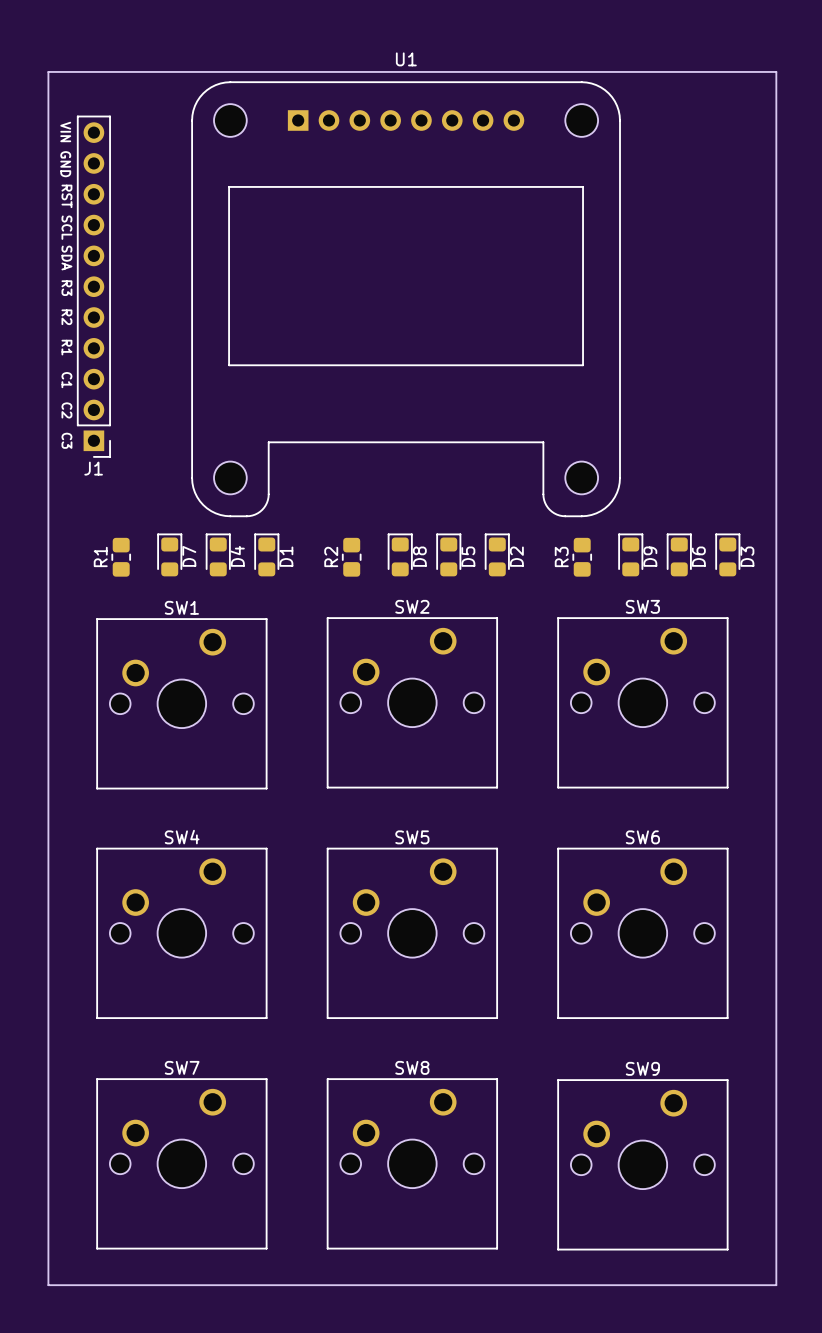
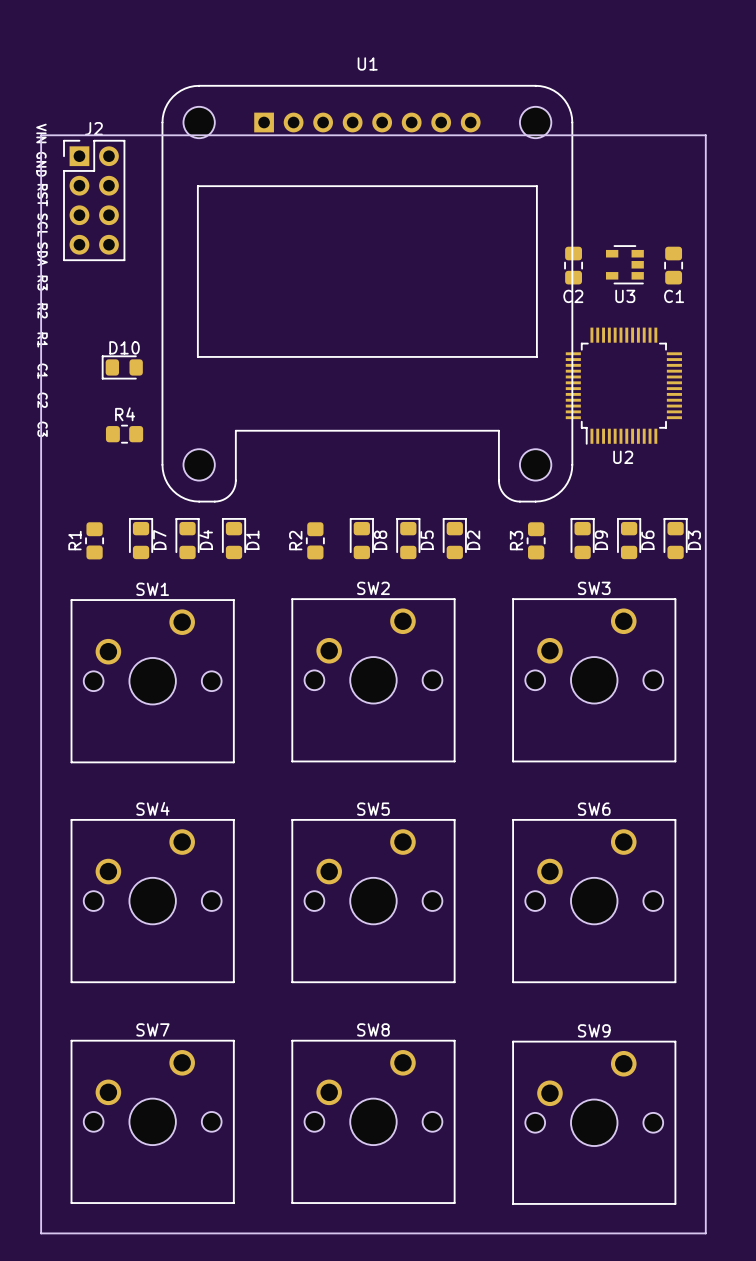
board edge: (48, 71) (48, 1285) (776, 1285) (776, 71) (48, 71) -> (41, 135) (41, 1233) (705, 1233) (705, 135) (41, 135)
J2: none -> (94, 200)
C2: none -> (573, 265)
U3: none -> (624, 264)
C1: none -> (673, 265)
J1: (93, 286) -> none
D10: none -> (122, 367)
U2: none -> (623, 386)
R4: none -> (124, 434)

